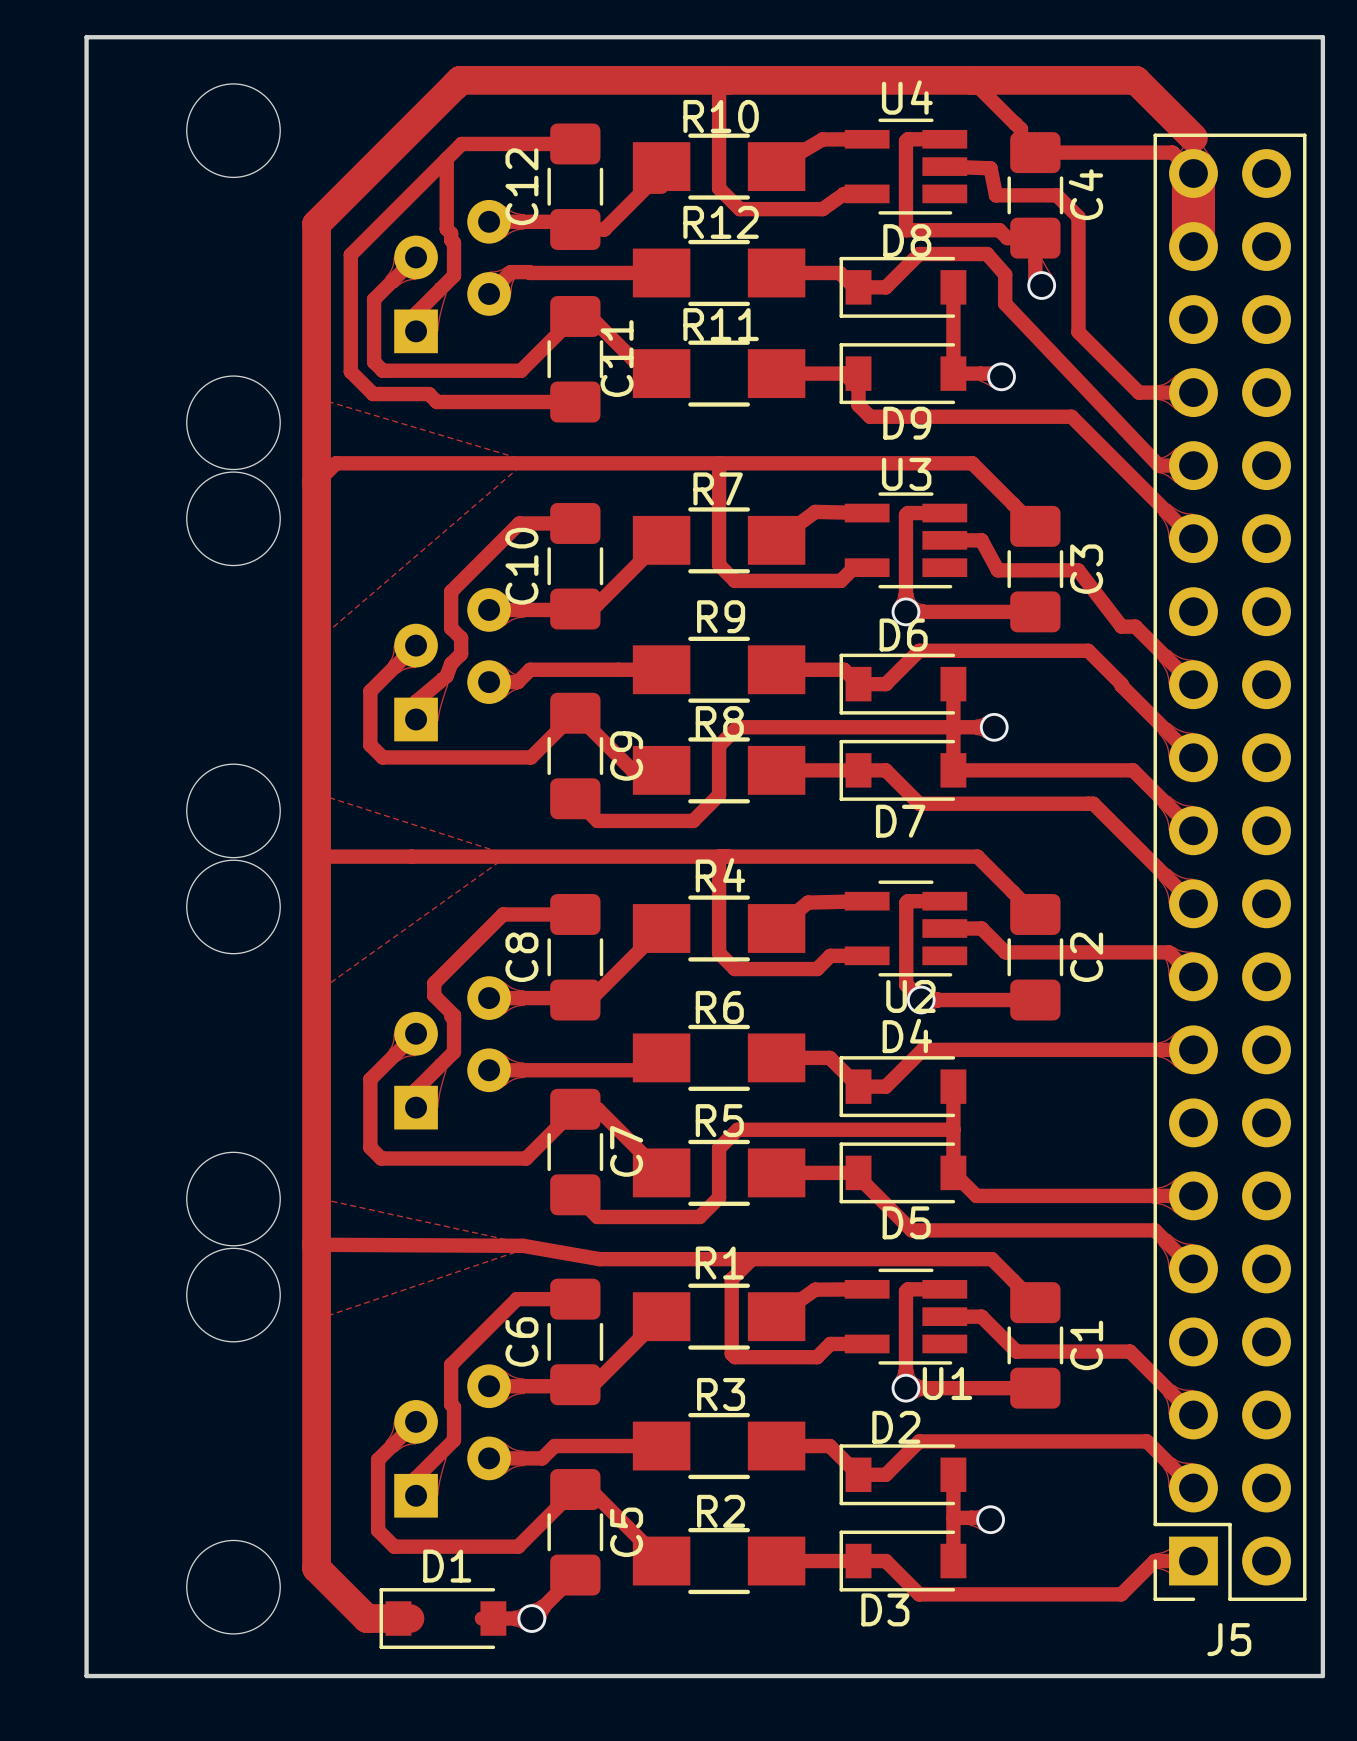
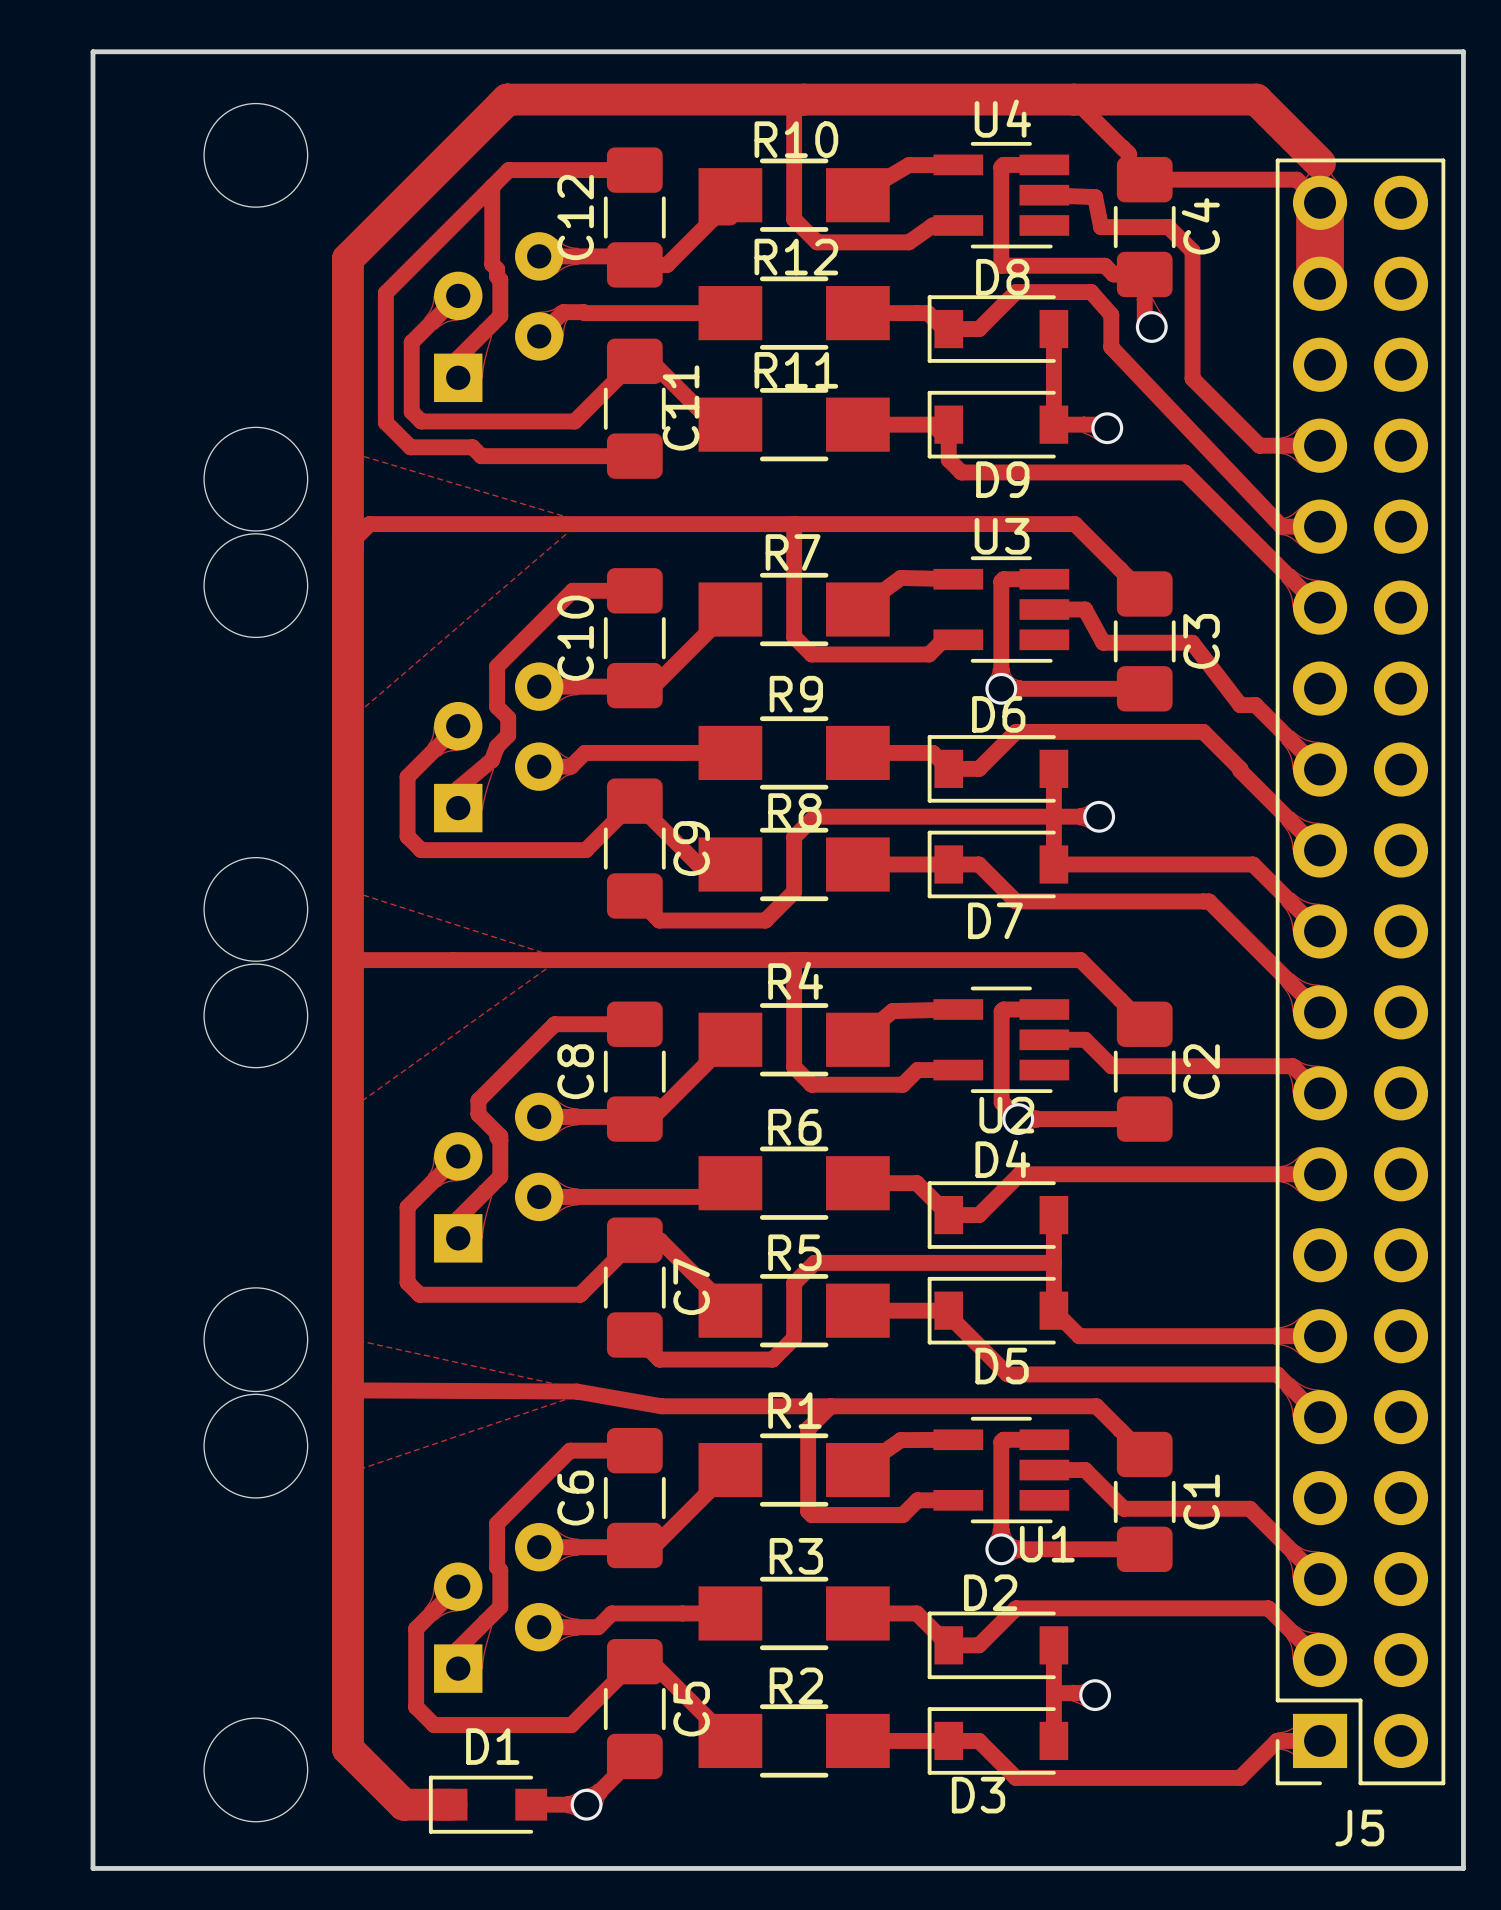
D1 footprint: [379, 1588, 507, 1650] -> [428, 1775, 548, 1834]

